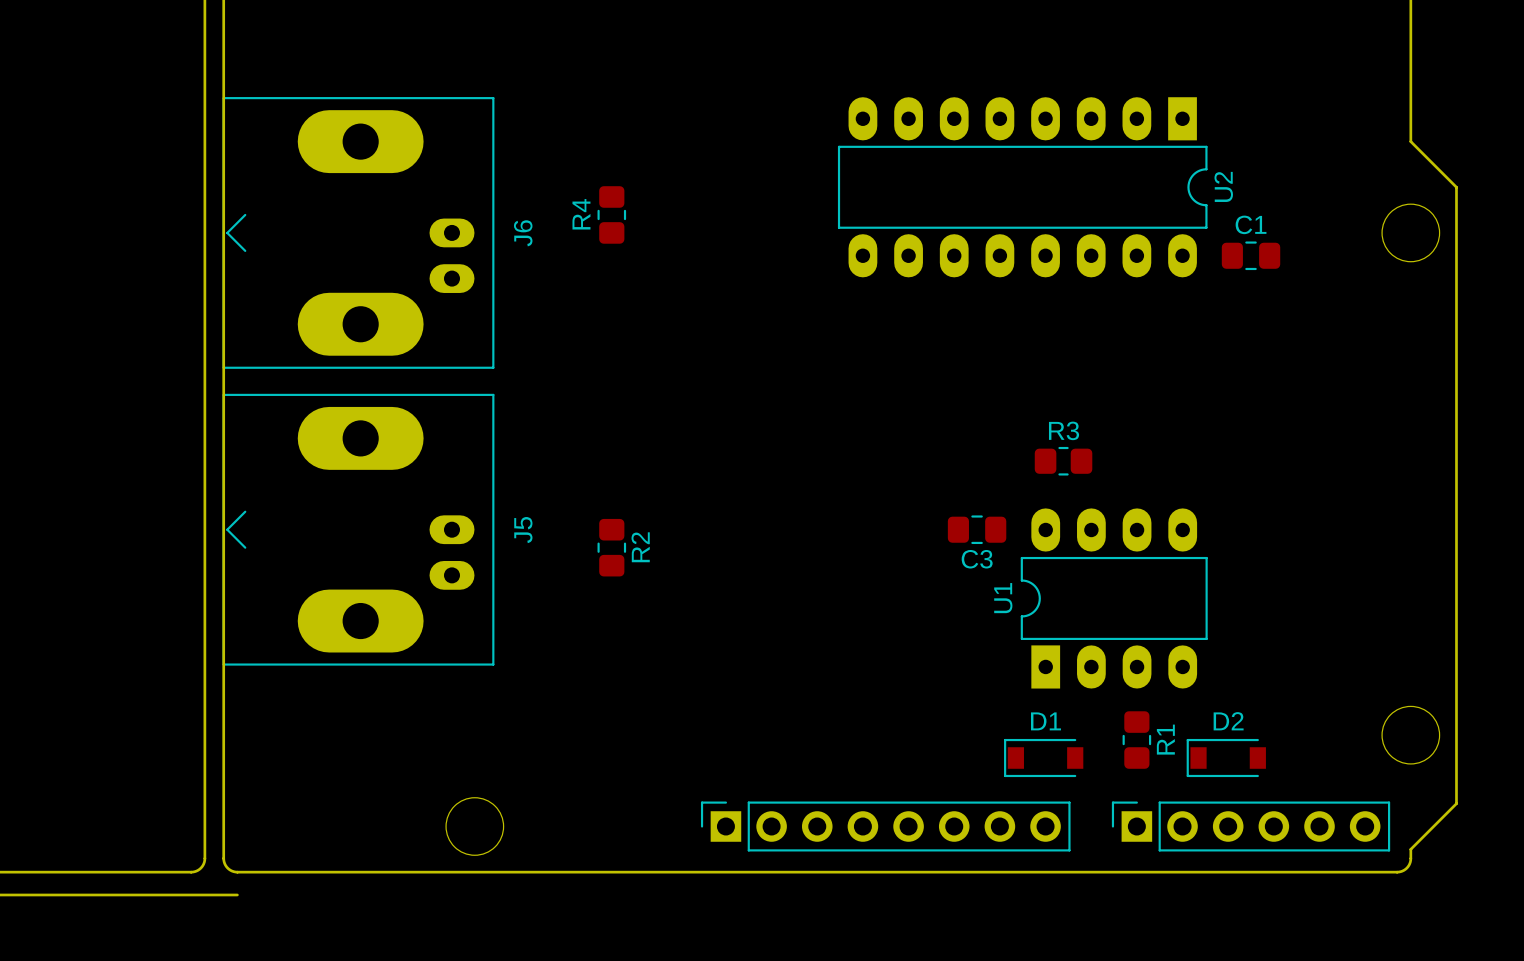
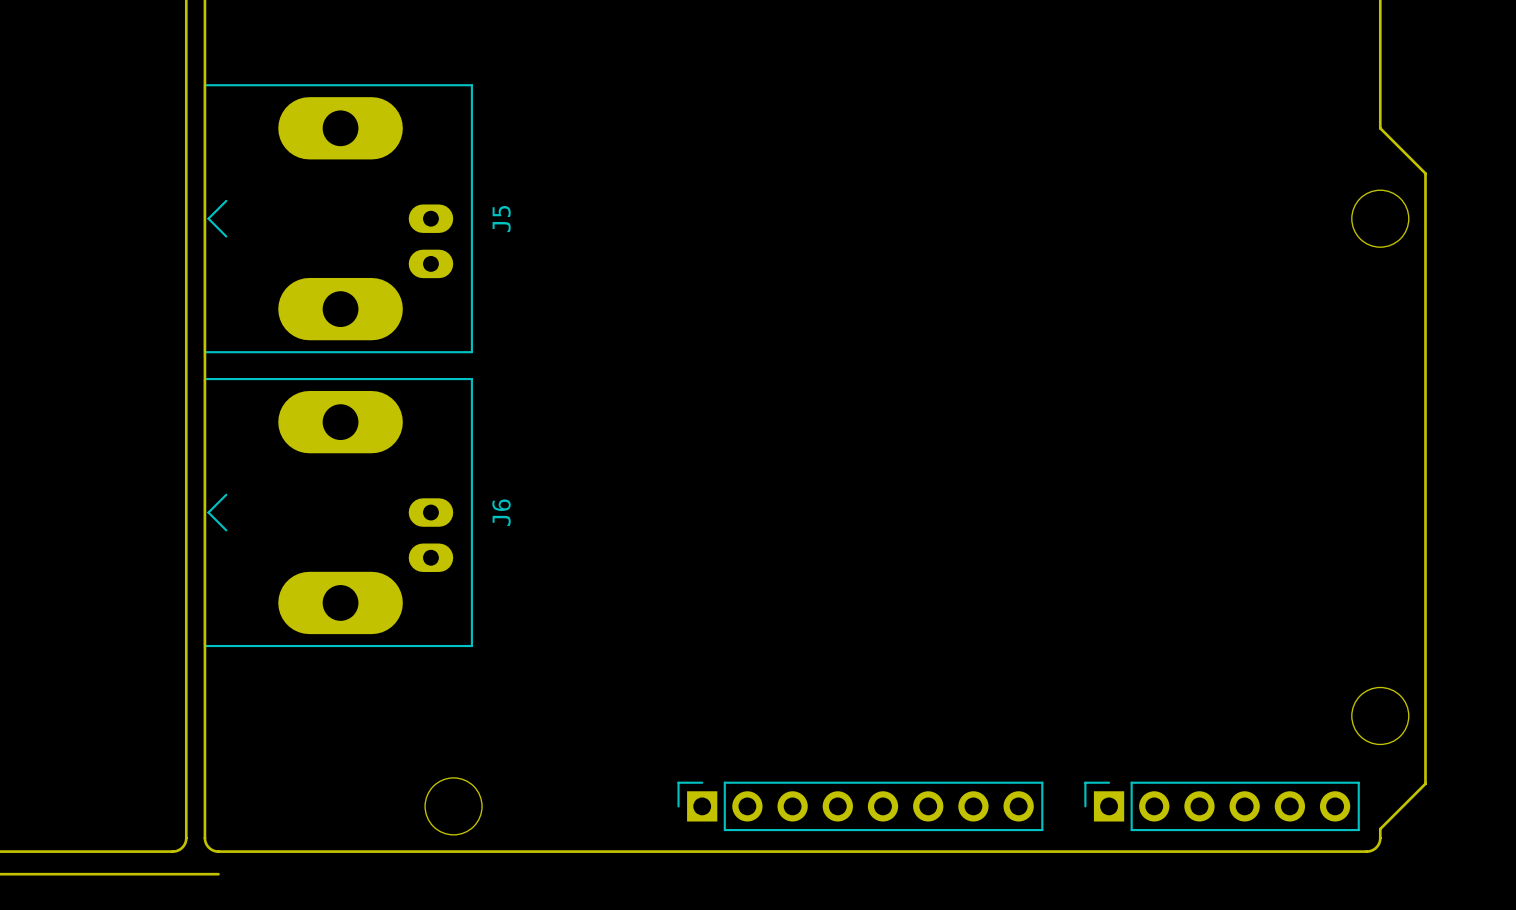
U2: (1022, 187) -> none
R4: (611, 214) -> none
J6 name: J6 (523, 233) -> J5 (501, 219)
C1: (1251, 255) -> none
R3: (1063, 461) -> none
C3: (977, 529) -> none
J5 name: J5 (523, 530) -> J6 (501, 512)
R2: (611, 547) -> none
U1: (1114, 598) -> none
R1: (1136, 740) -> none
D1: (1043, 758) -> none
D2: (1226, 758) -> none

